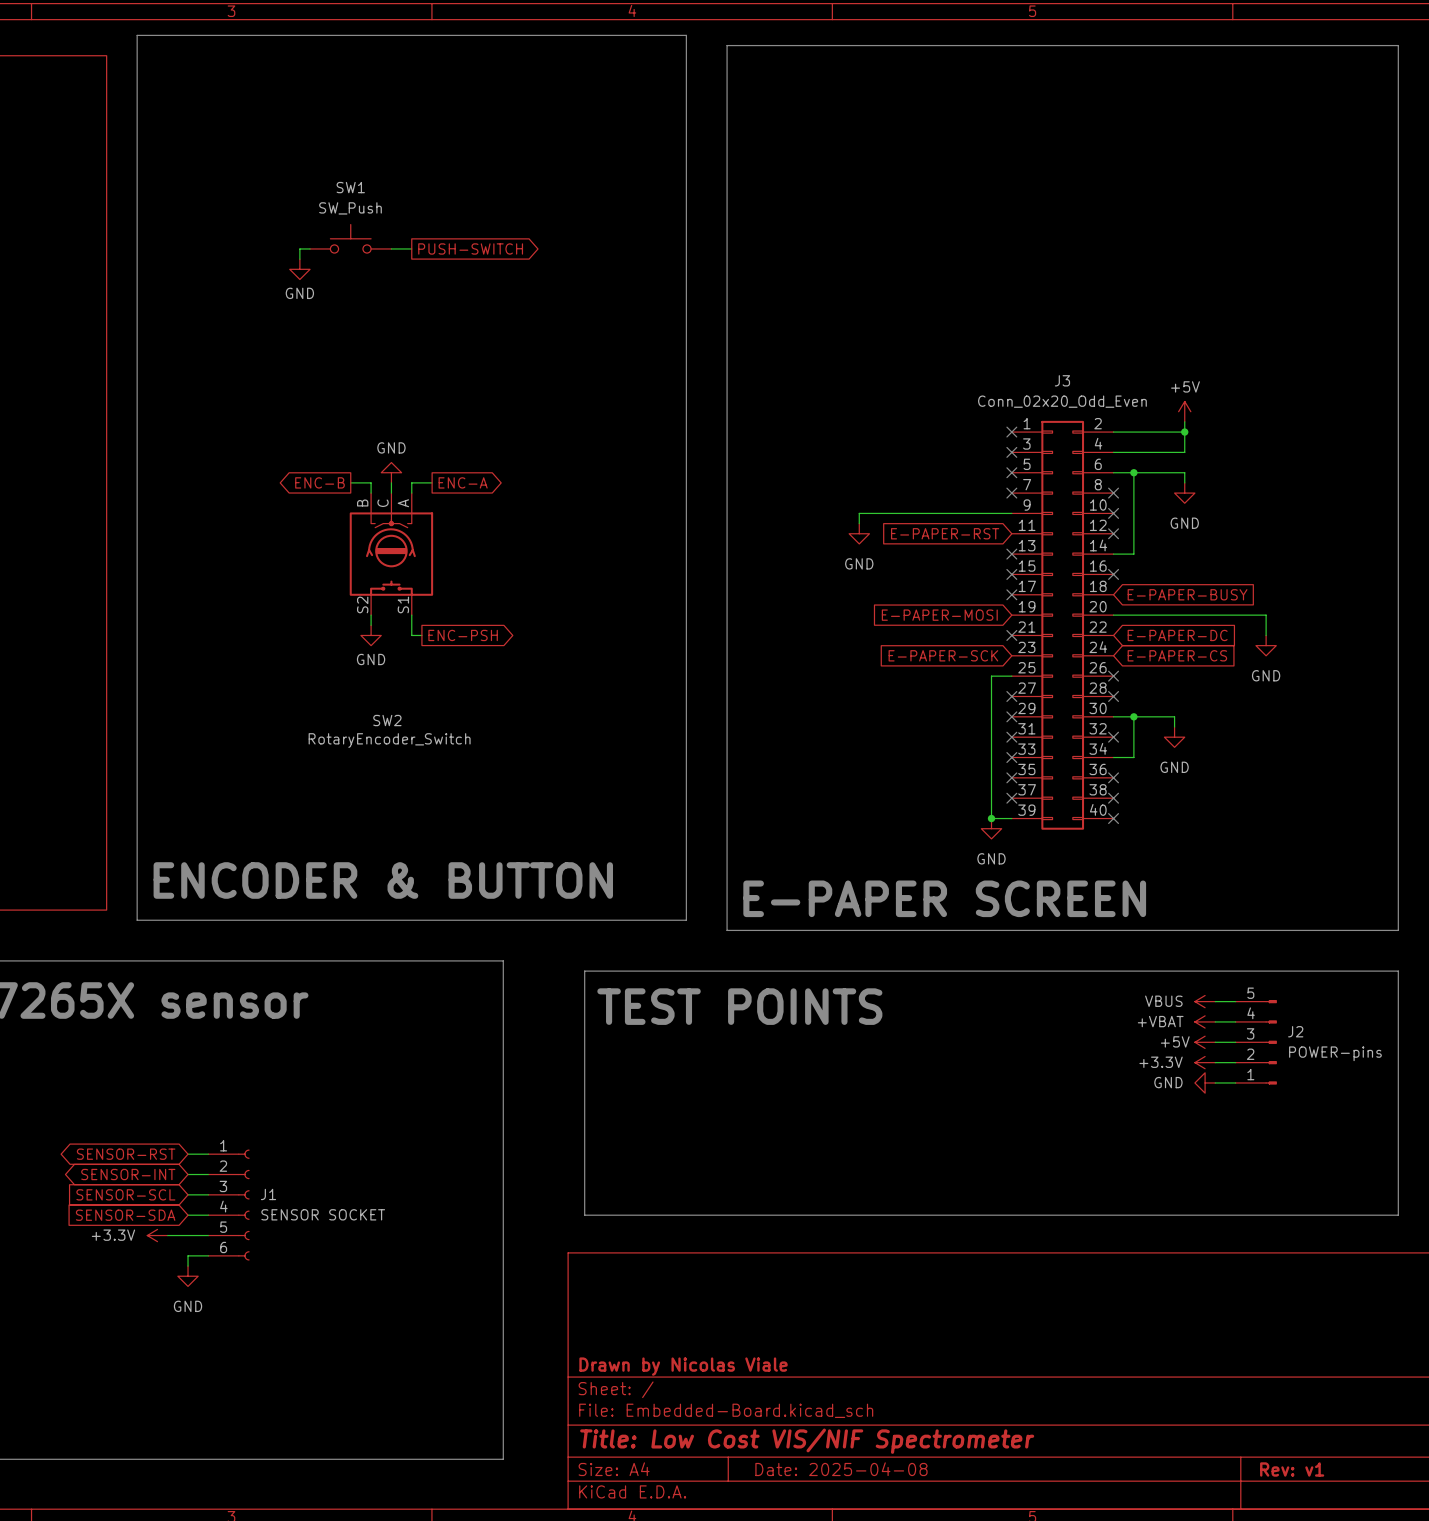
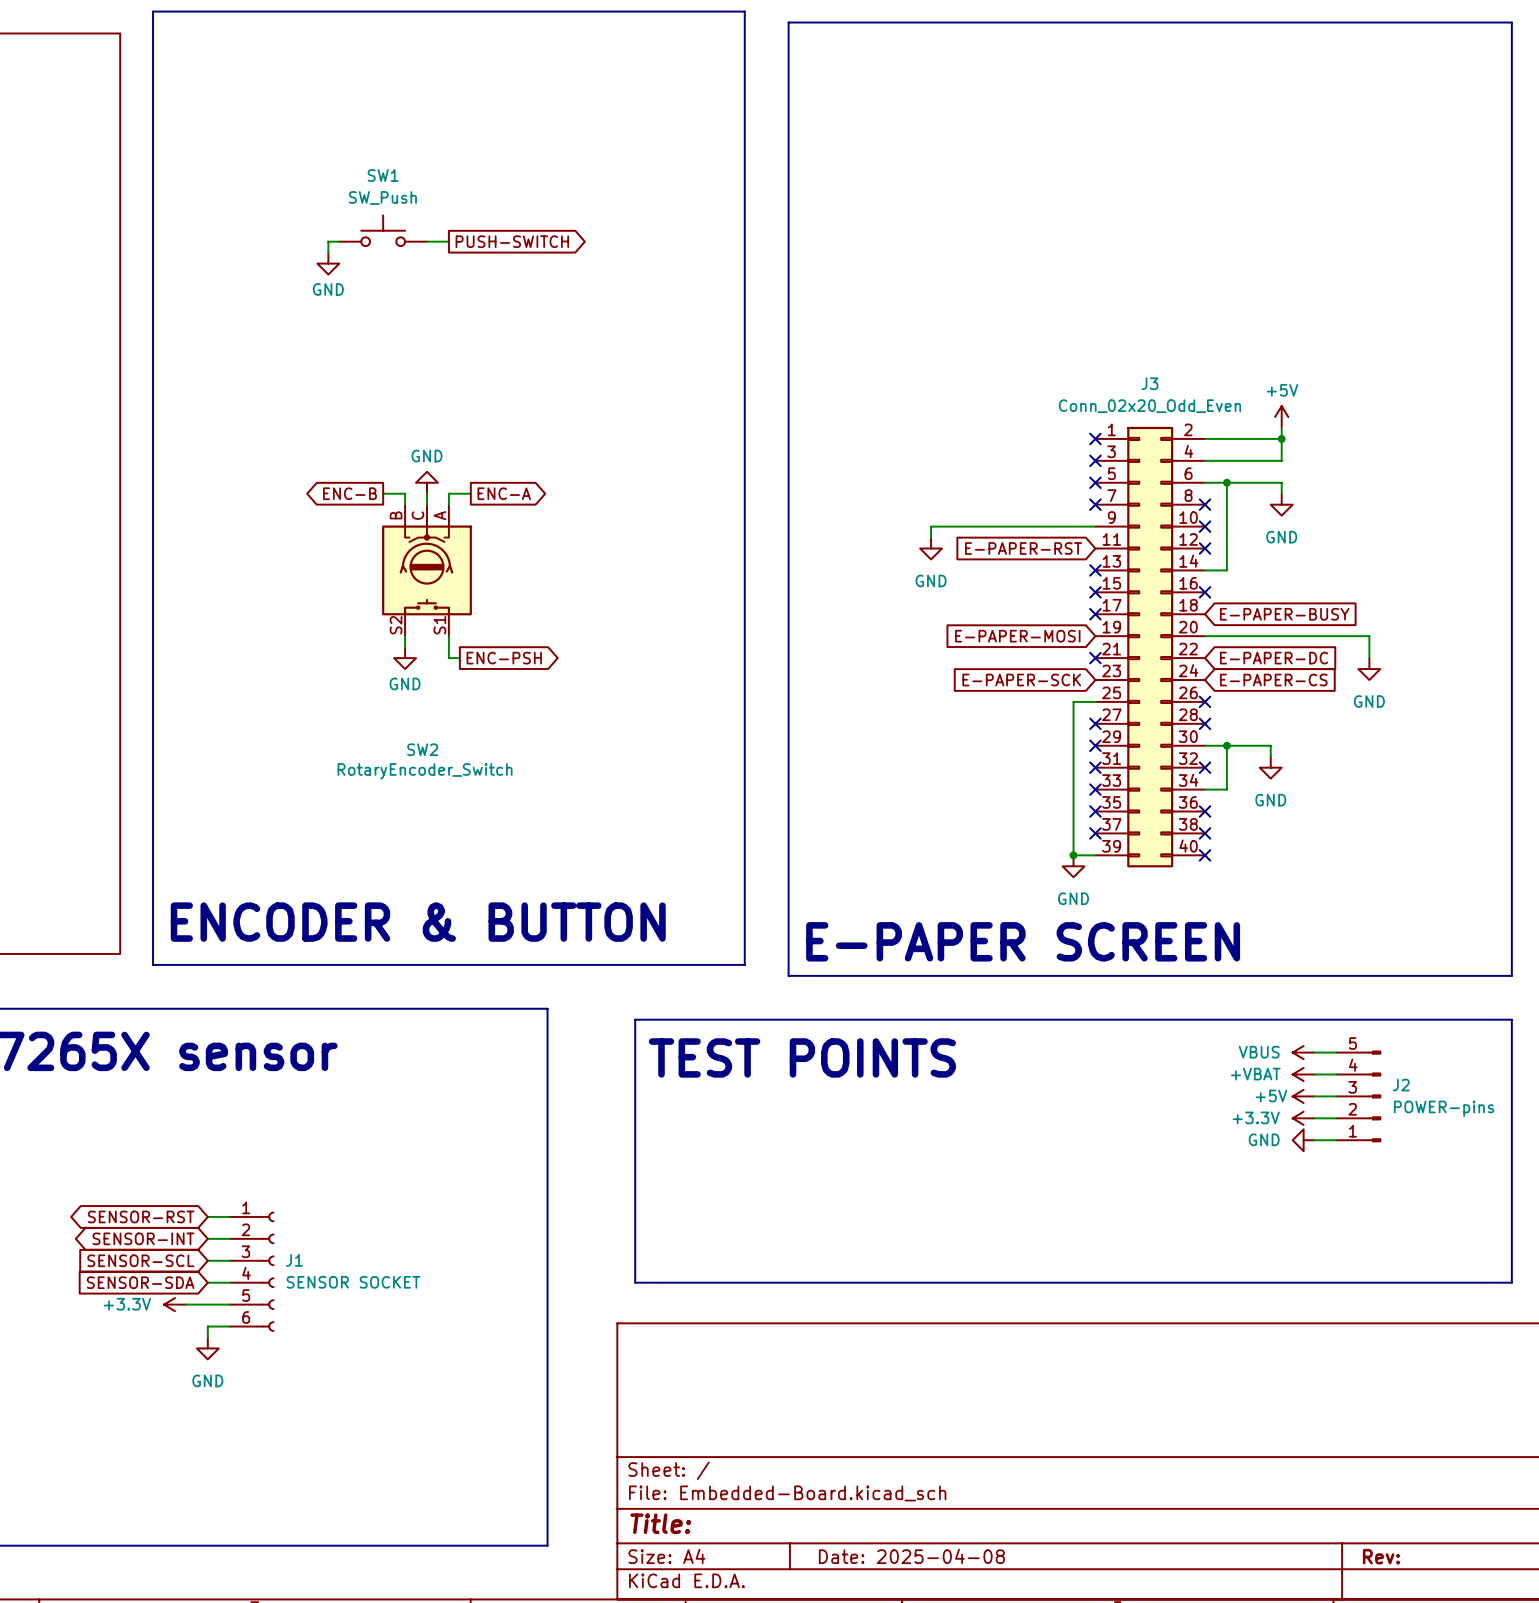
title block: Drawn by Nicolas Viale (683, 1366) -> none
title block: Title: Low Cost VIS/NIF Spectrometer (807, 1441) -> Title: (660, 1523)
title block: Rev: v1 (1292, 1469) -> Rev: (1381, 1556)

